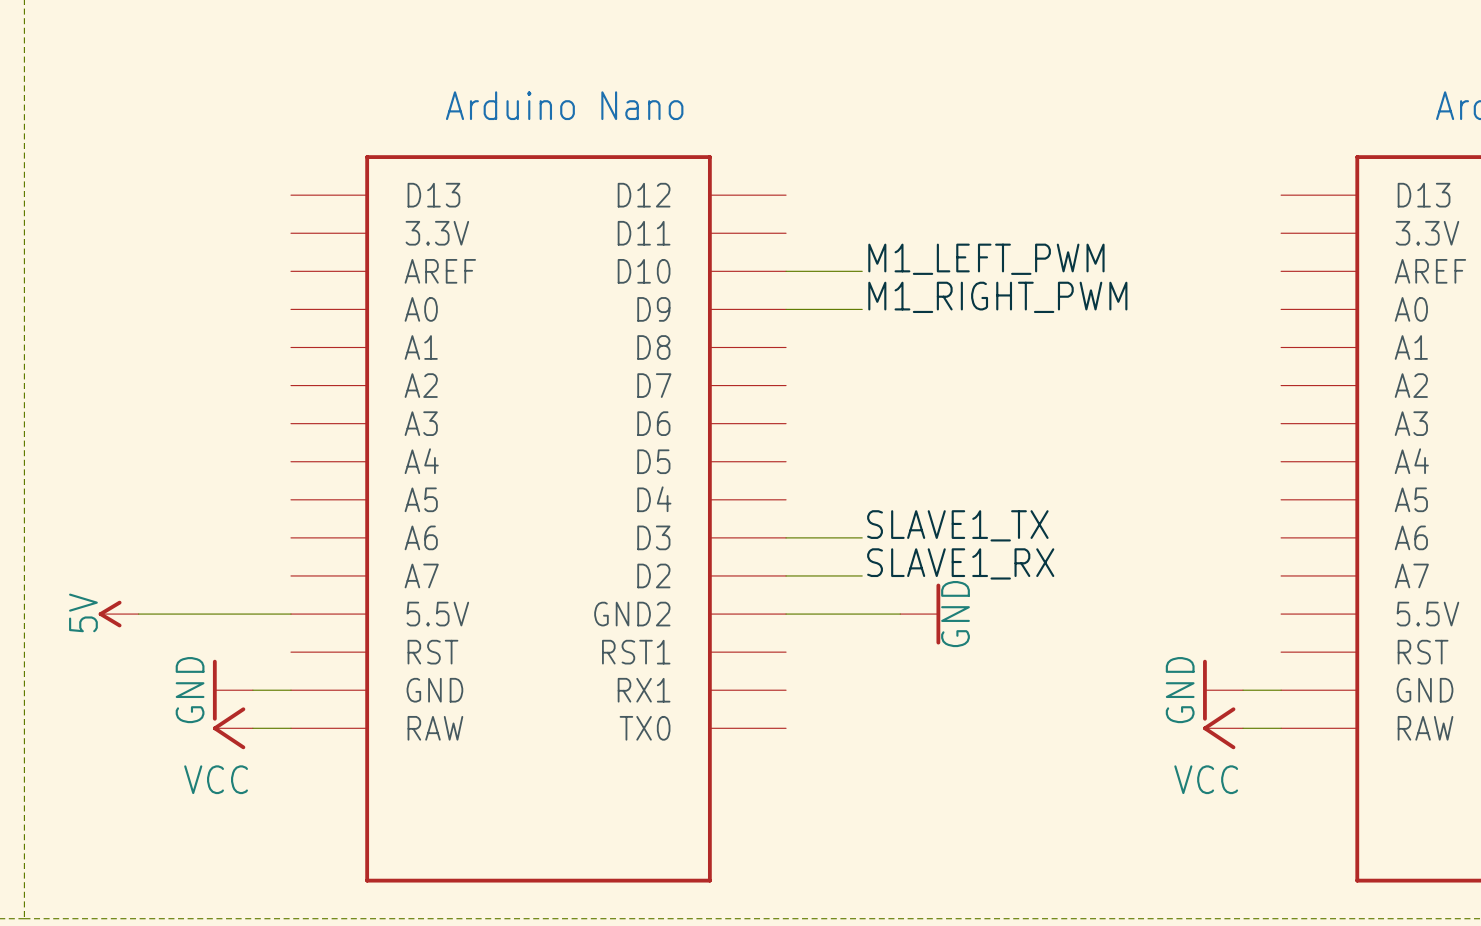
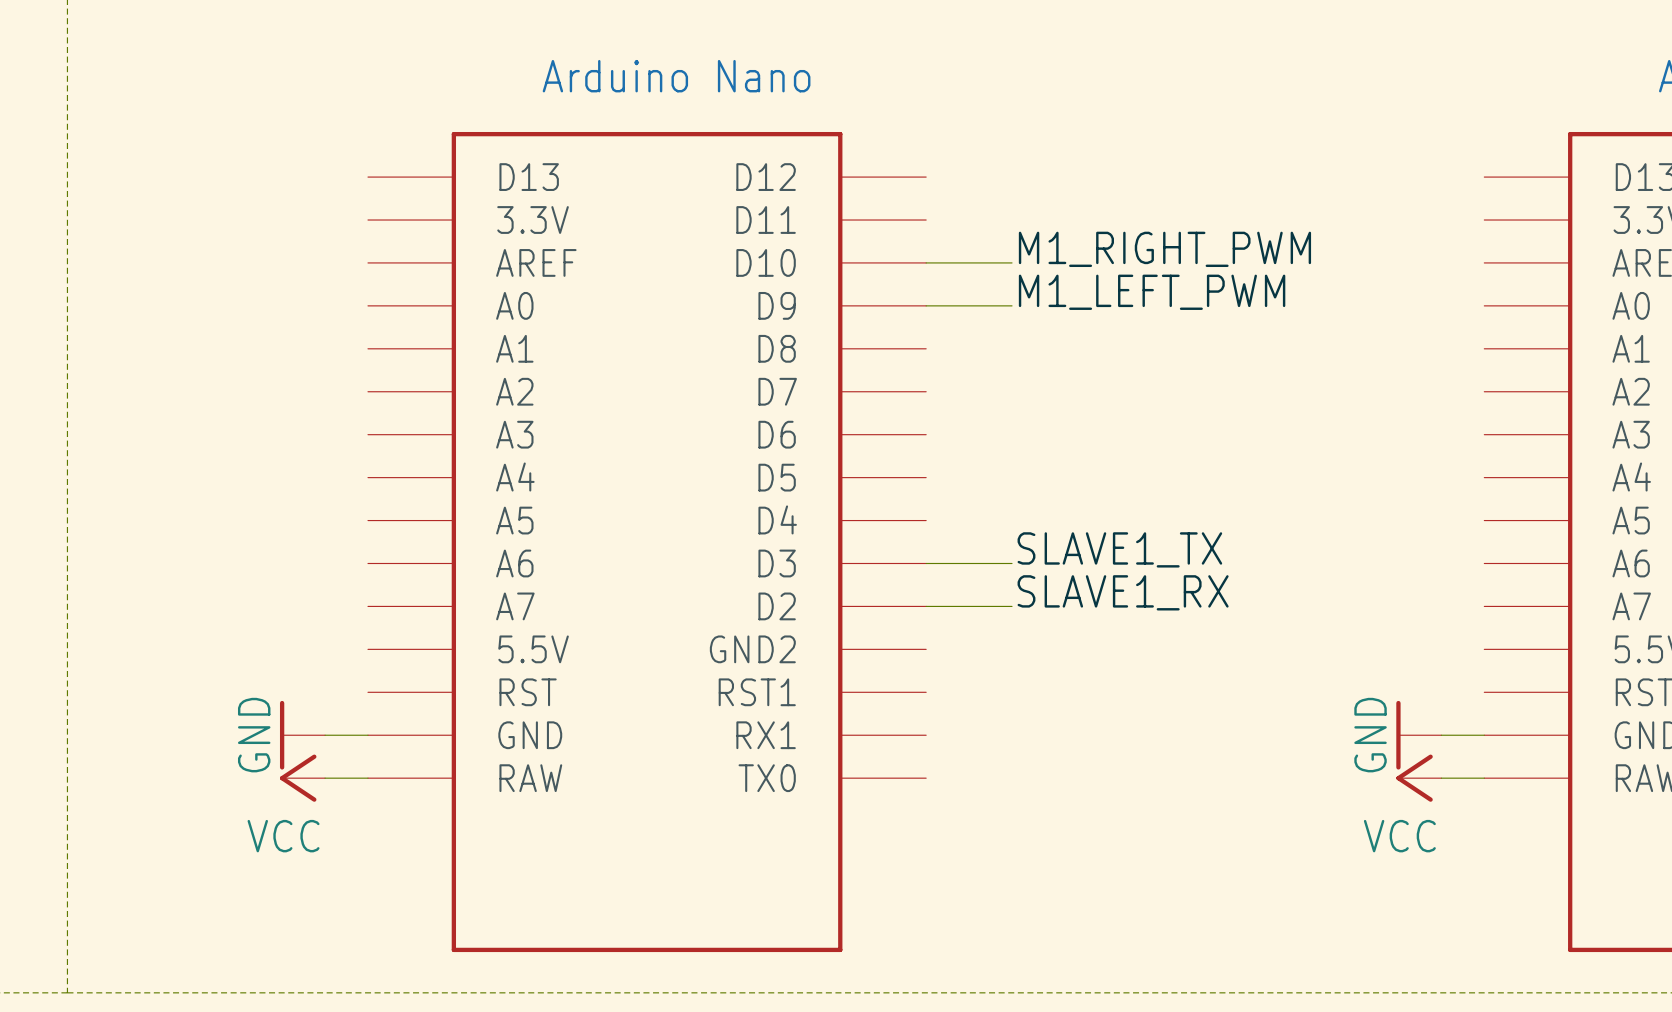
label: M1_LEFT_PWM (986, 259) -> M1_RIGHT_PWM (1164, 249)
label: M1_RIGHT_PWM (997, 297) -> M1_LEFT_PWM (1152, 292)
power symbol: 5V (118, 614) -> none
wire: (138, 614) (290, 614) -> none
wire: (786, 614) (900, 614) -> none
power symbol: GND (920, 614) -> none

